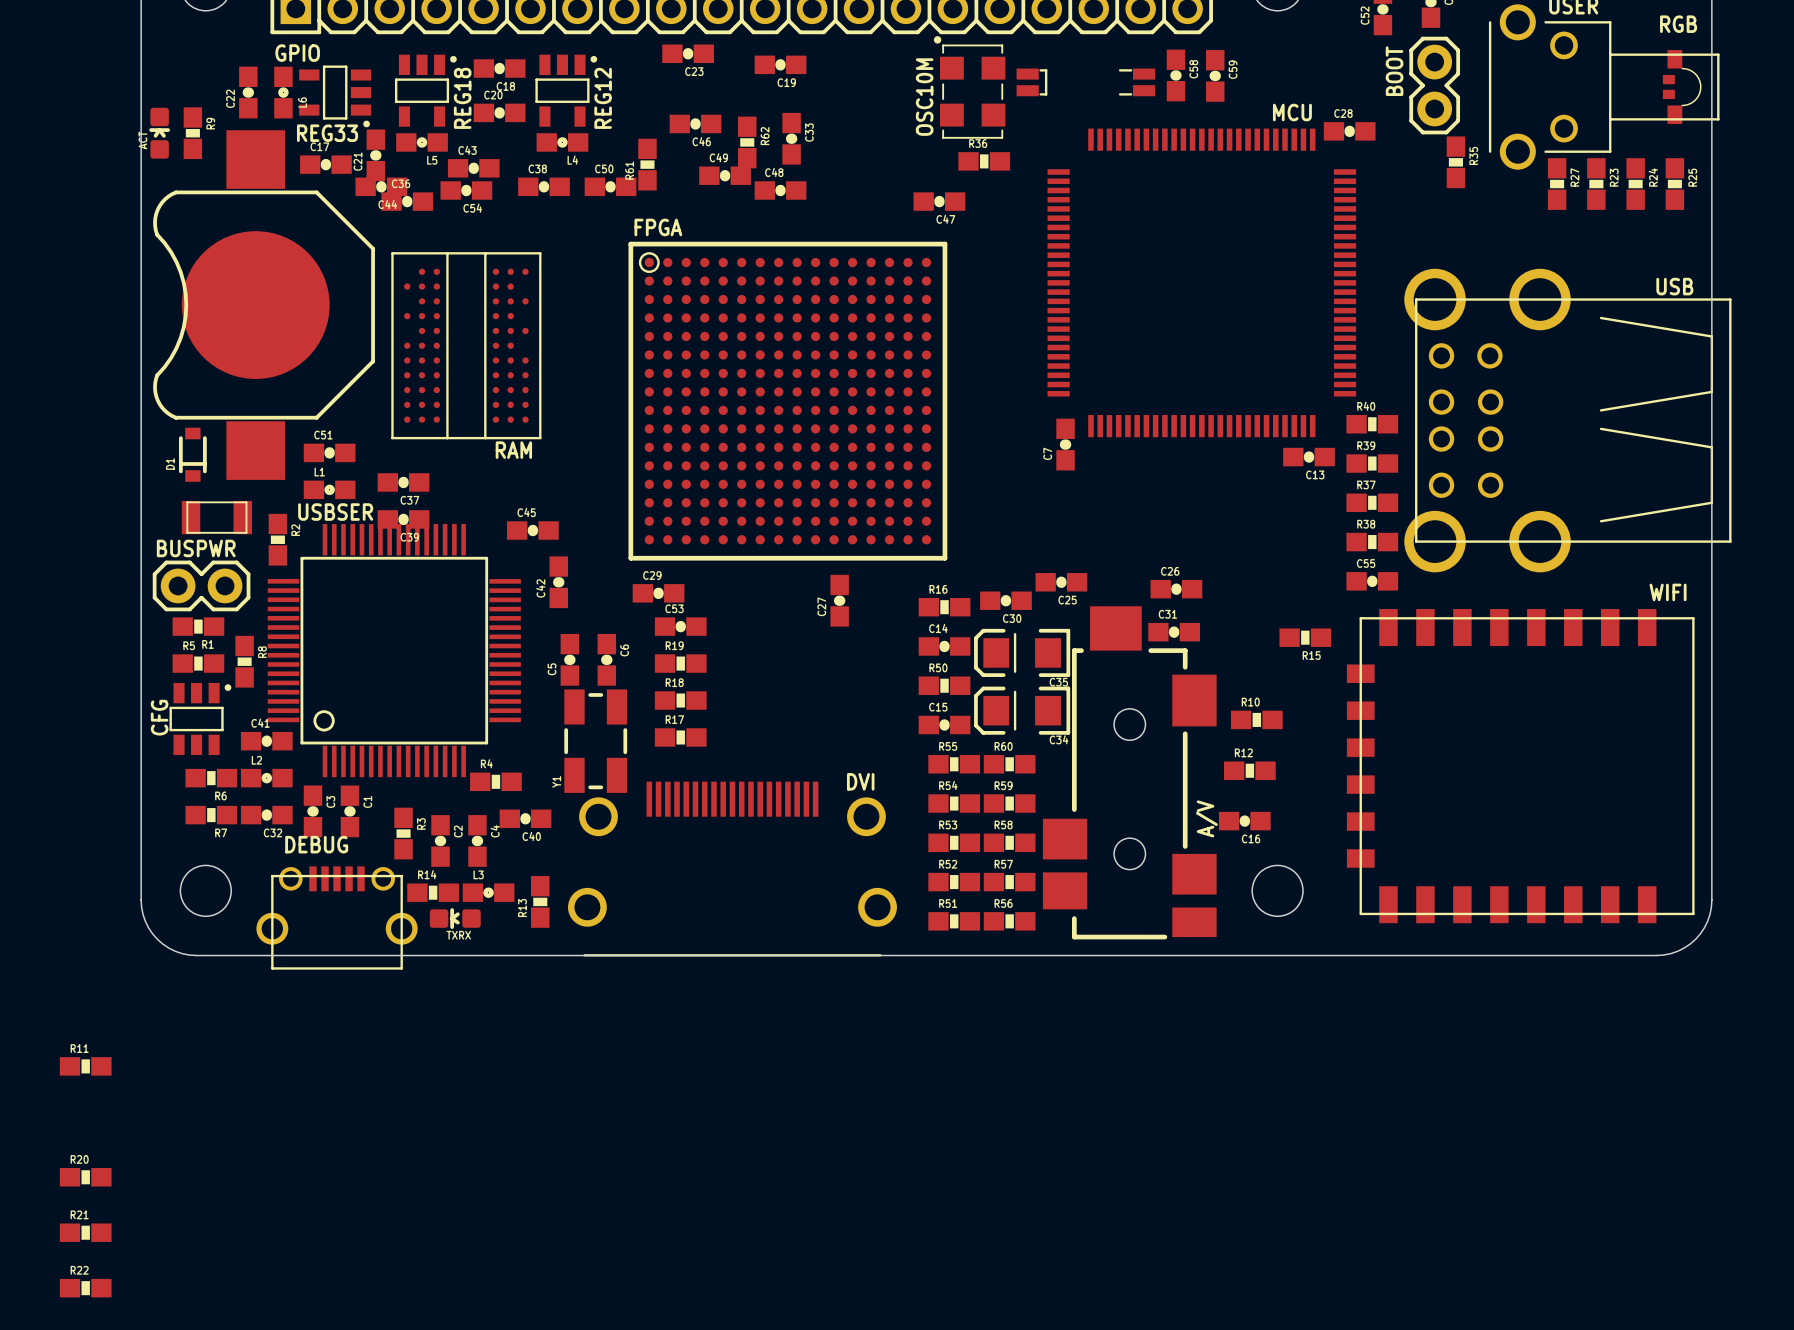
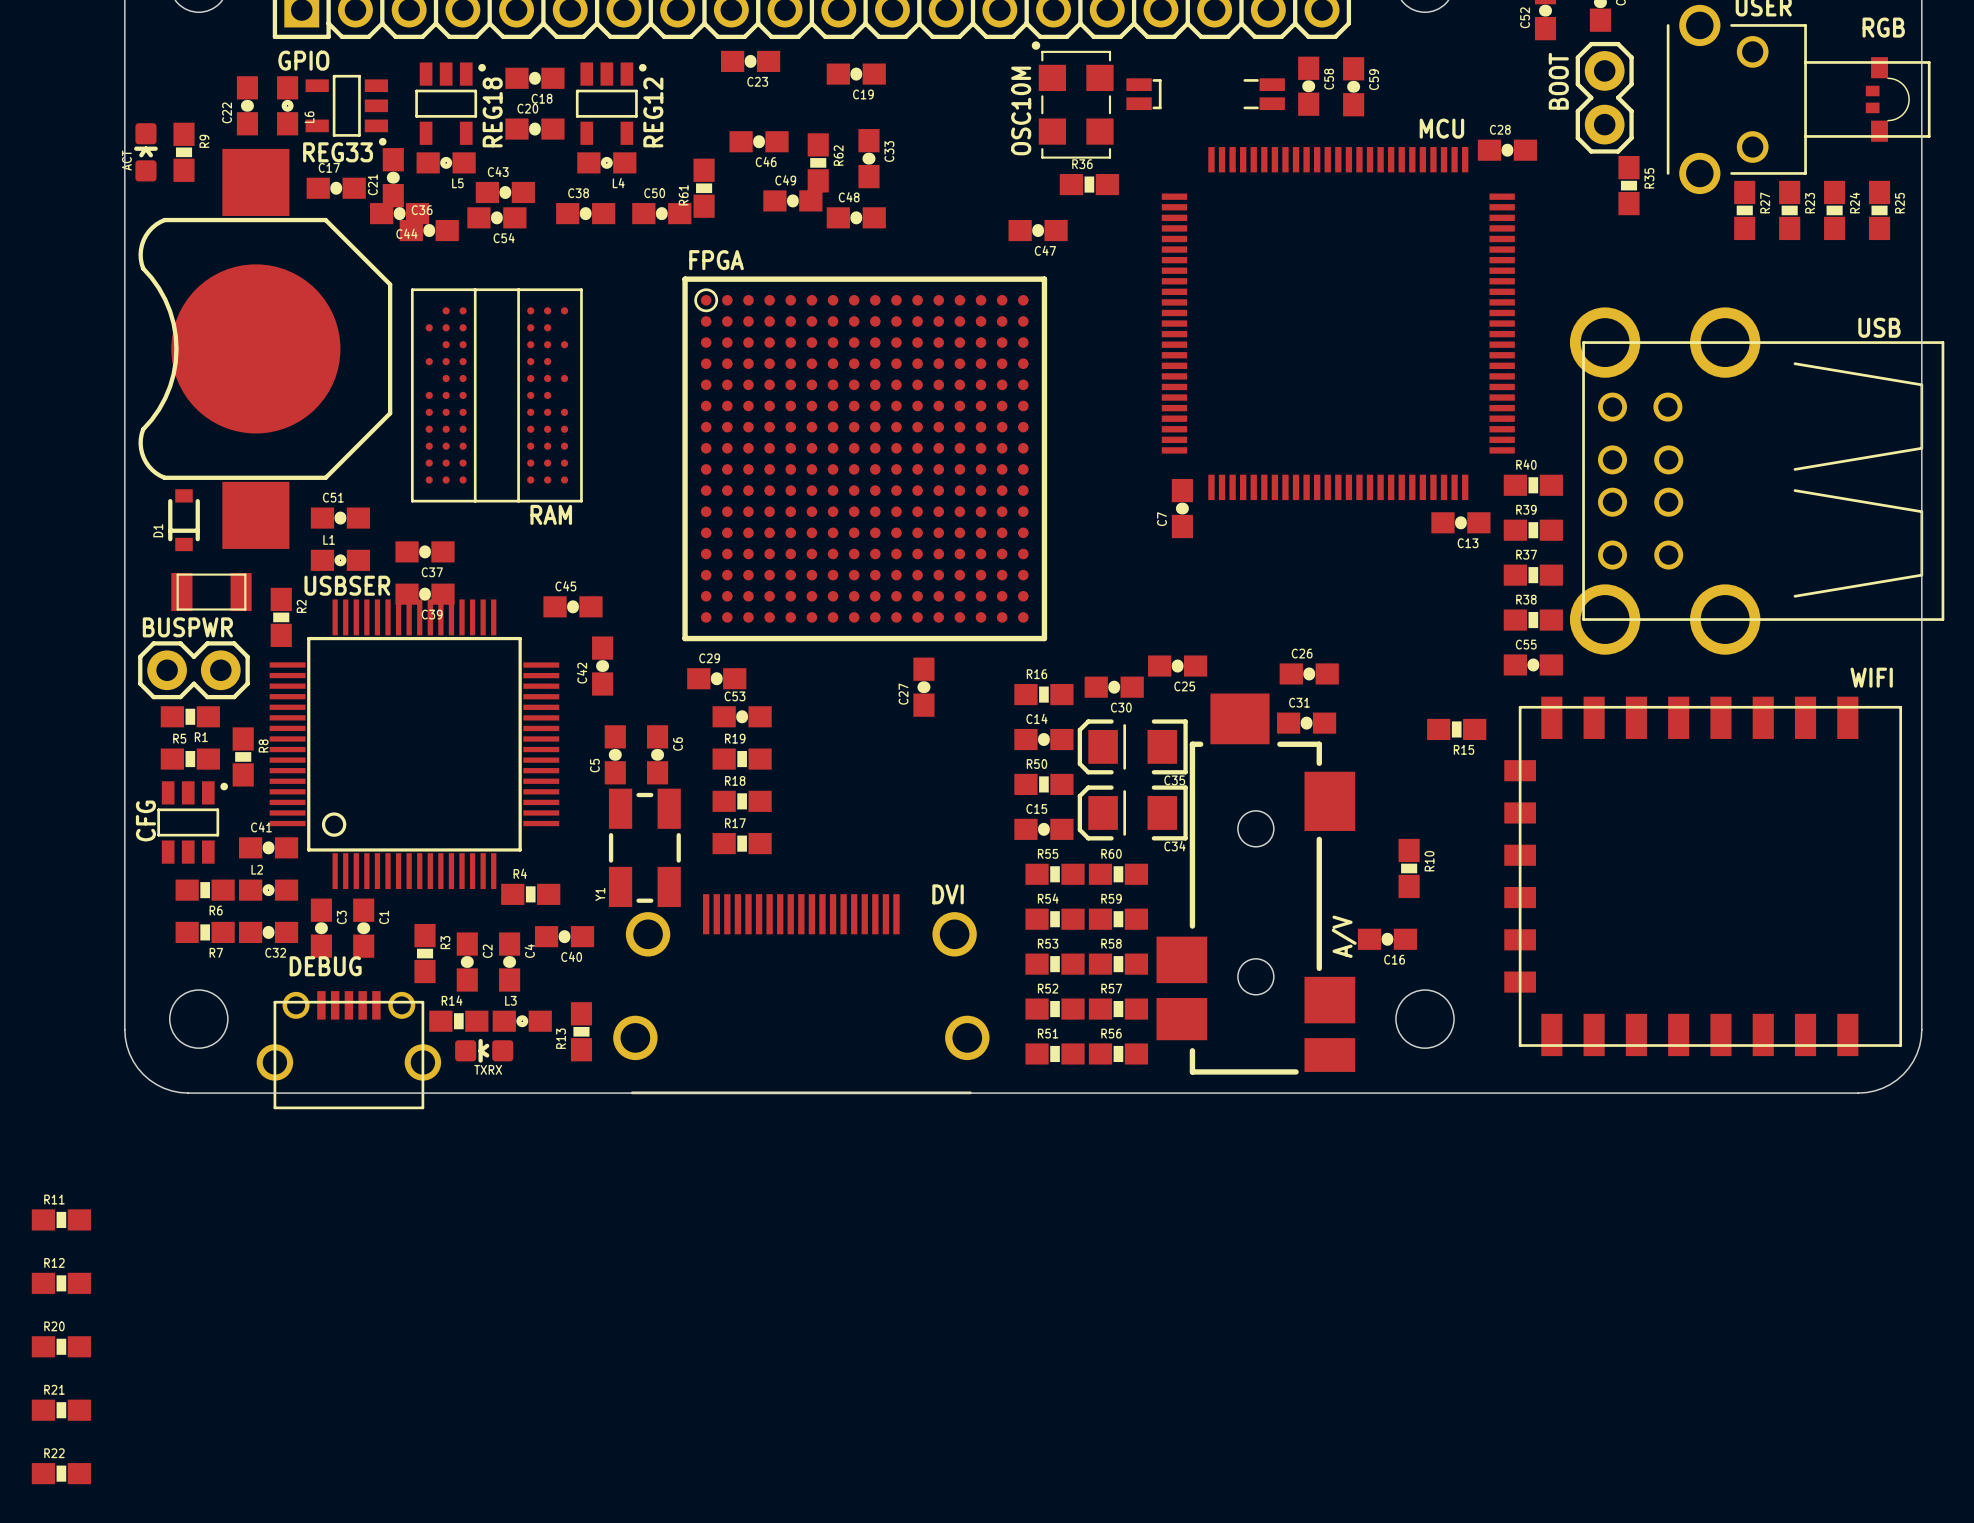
R10 rotation: 0° (1256, 719) -> 90° clockwise (1409, 868)
R10 position: (1256, 719) -> (1409, 868)
R12 position: (1249, 770) -> (61, 1283)

